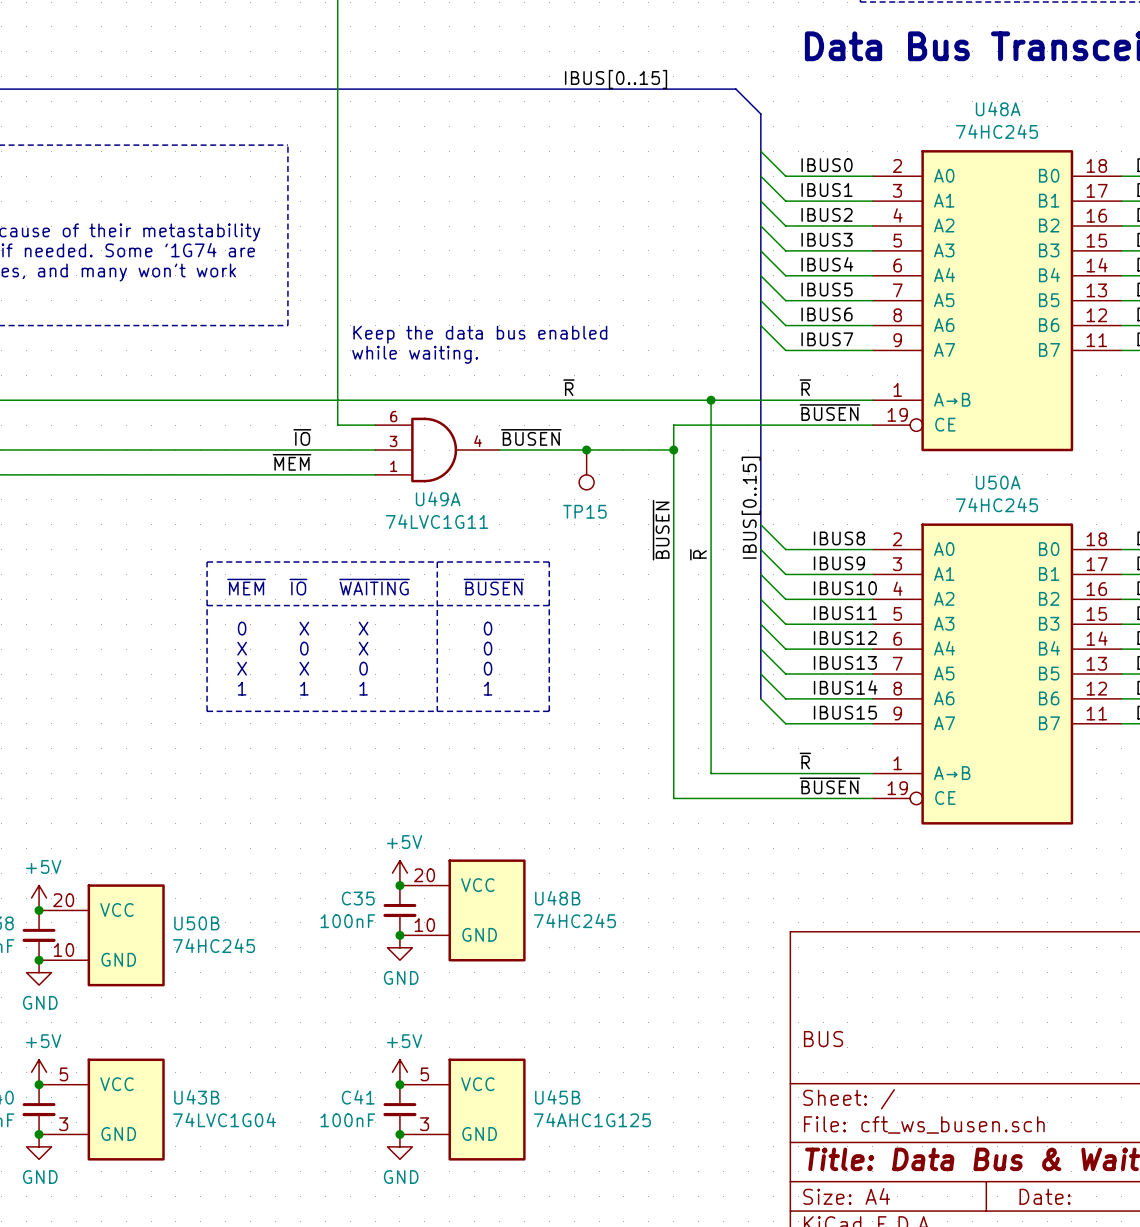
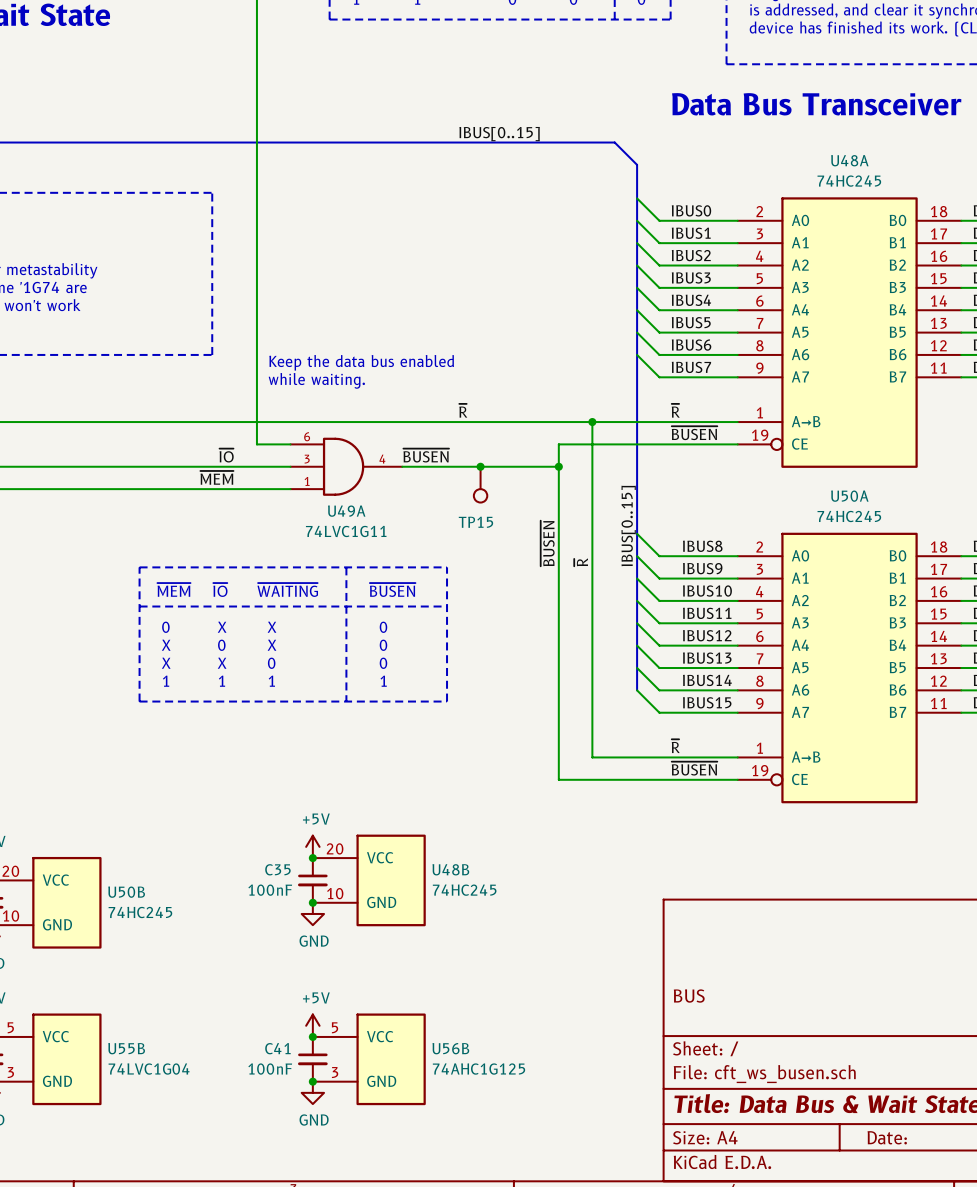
U43B name: U43B (196, 1097) -> U55B (126, 1048)
U45B name: U45B (557, 1097) -> U56B (450, 1048)

